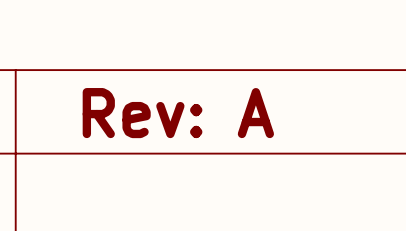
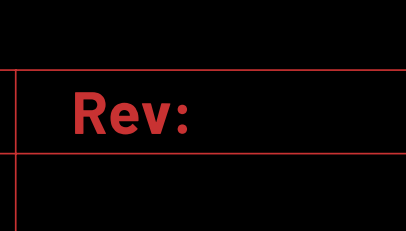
title block: Rev: A (178, 113) -> Rev: (131, 113)

